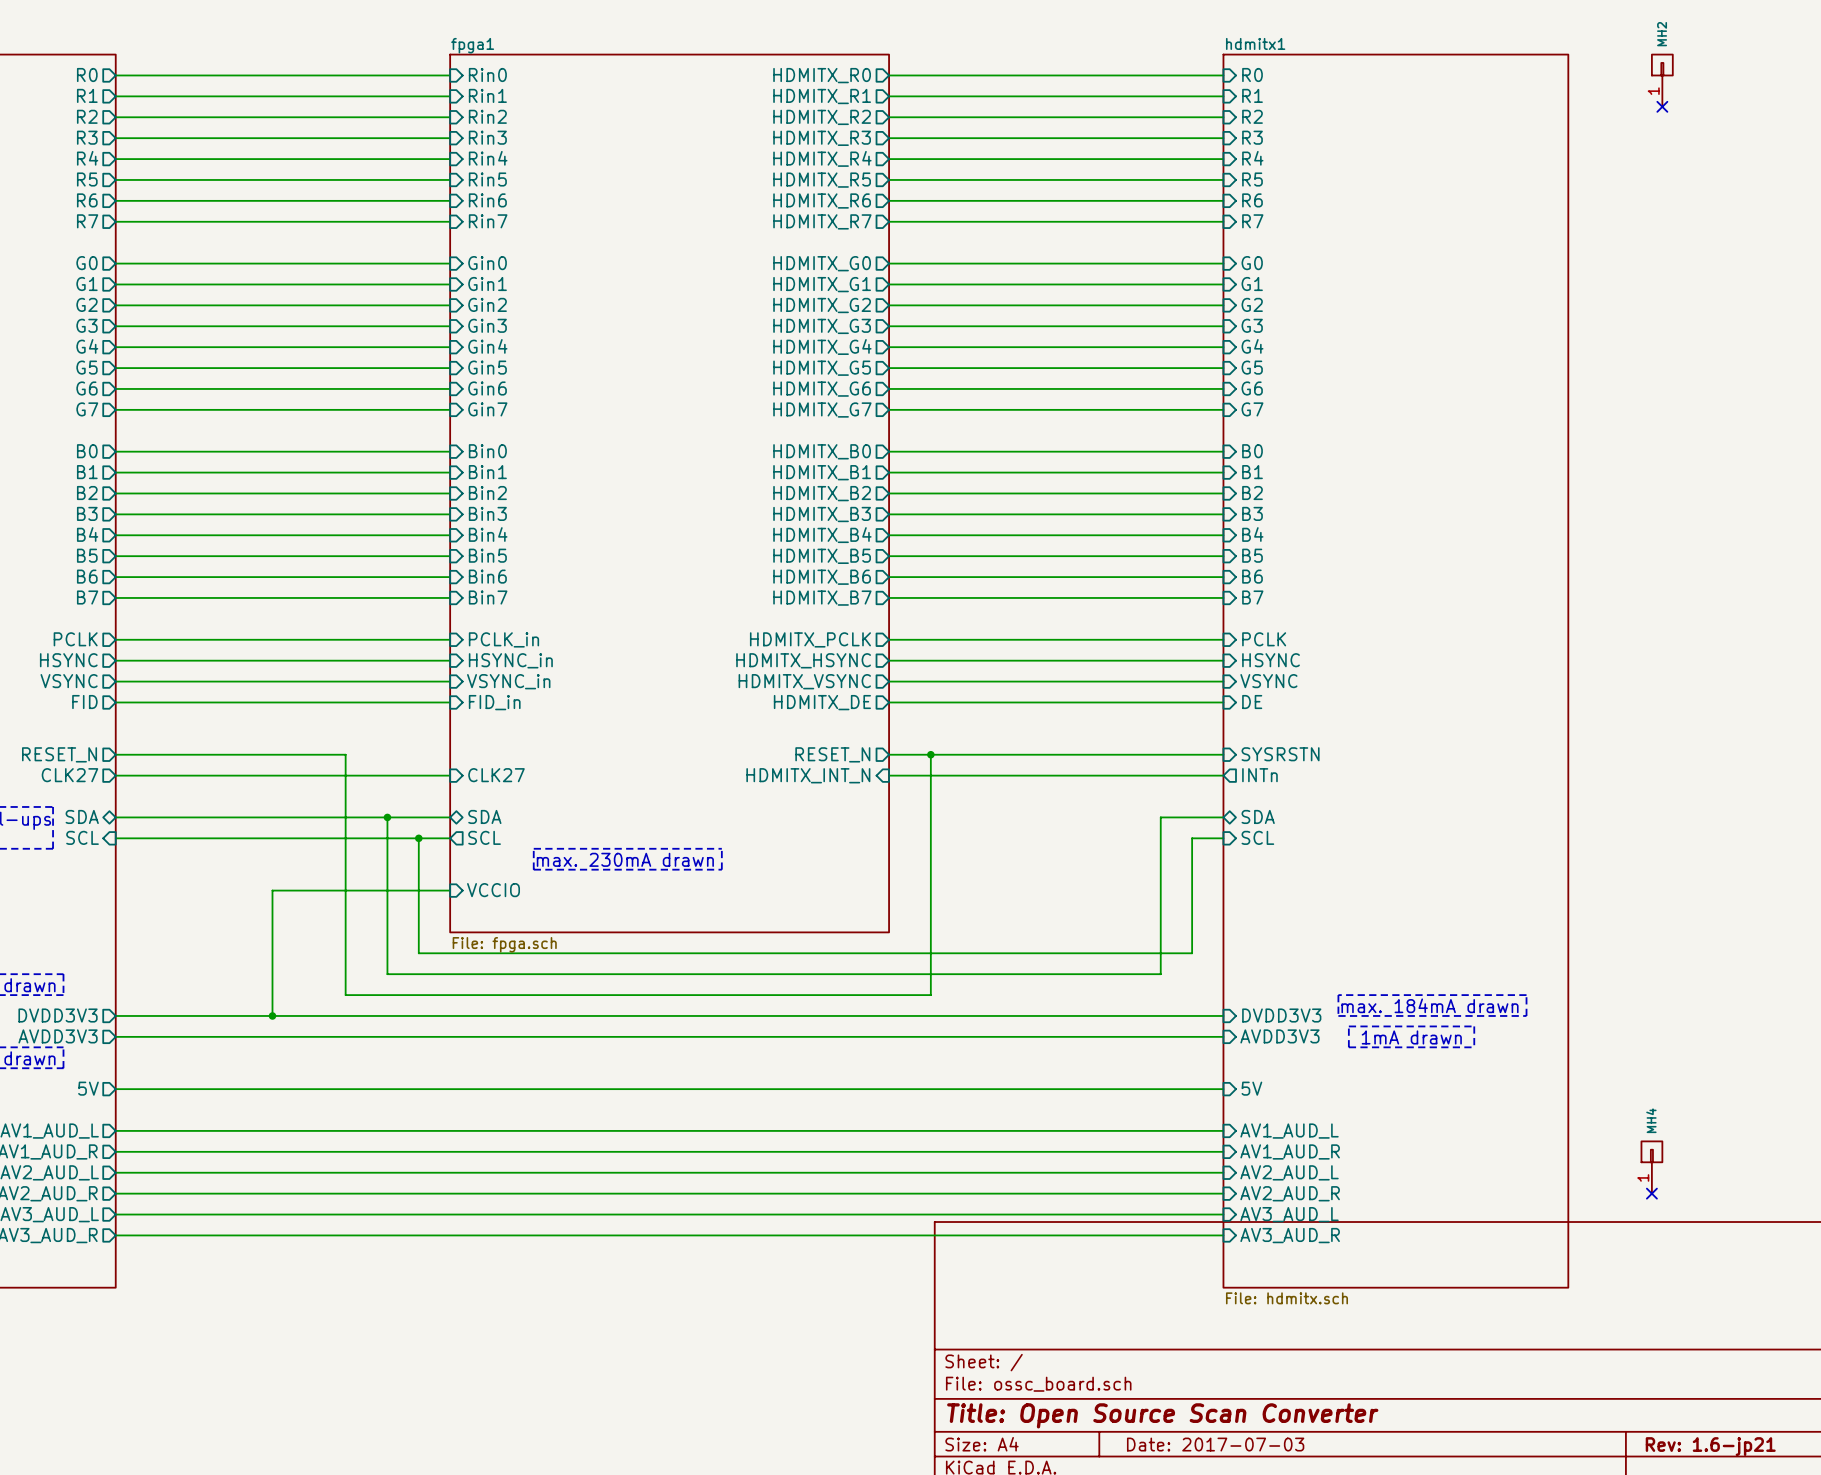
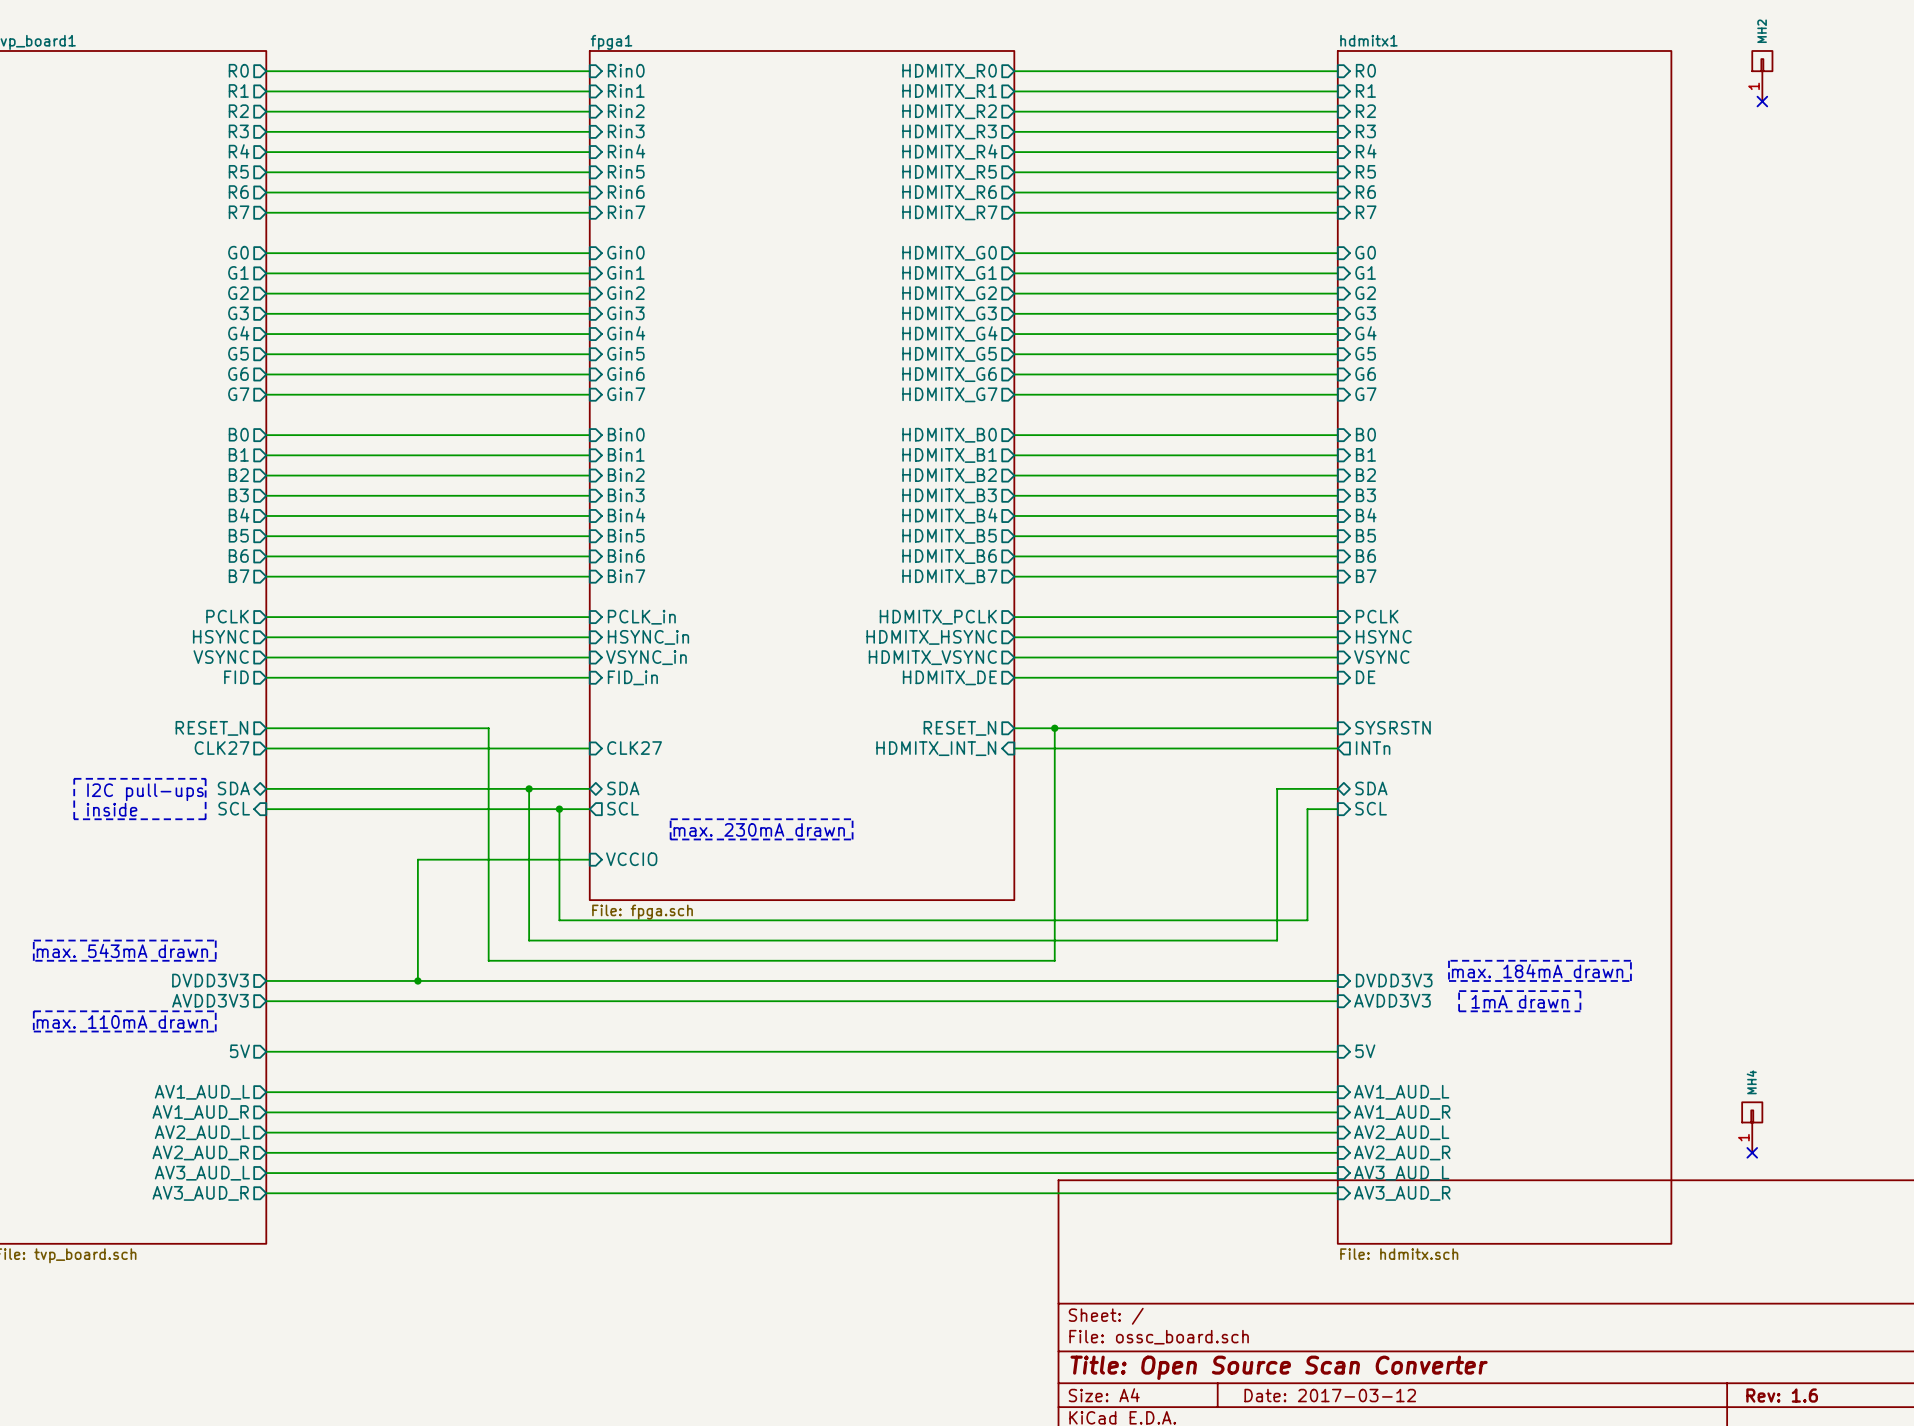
title block: Date: 2017-07-03 (1215, 1444) -> Date: 2017-03-12 (1330, 1395)
title block: Rev: 1.6-jp21 (1710, 1446) -> Rev: 1.6 (1782, 1395)

